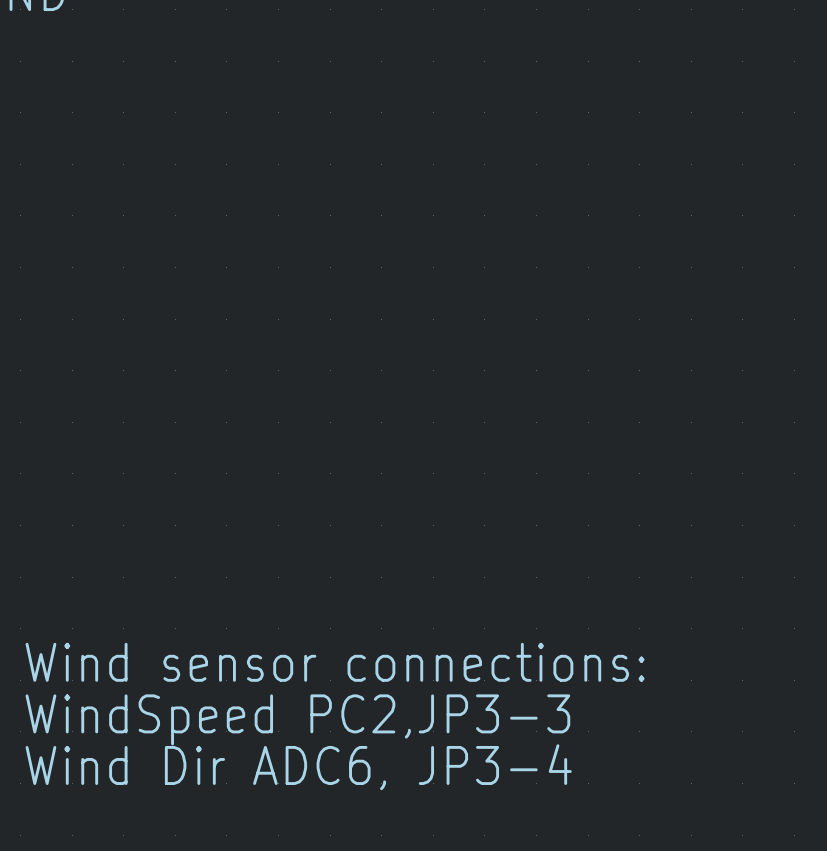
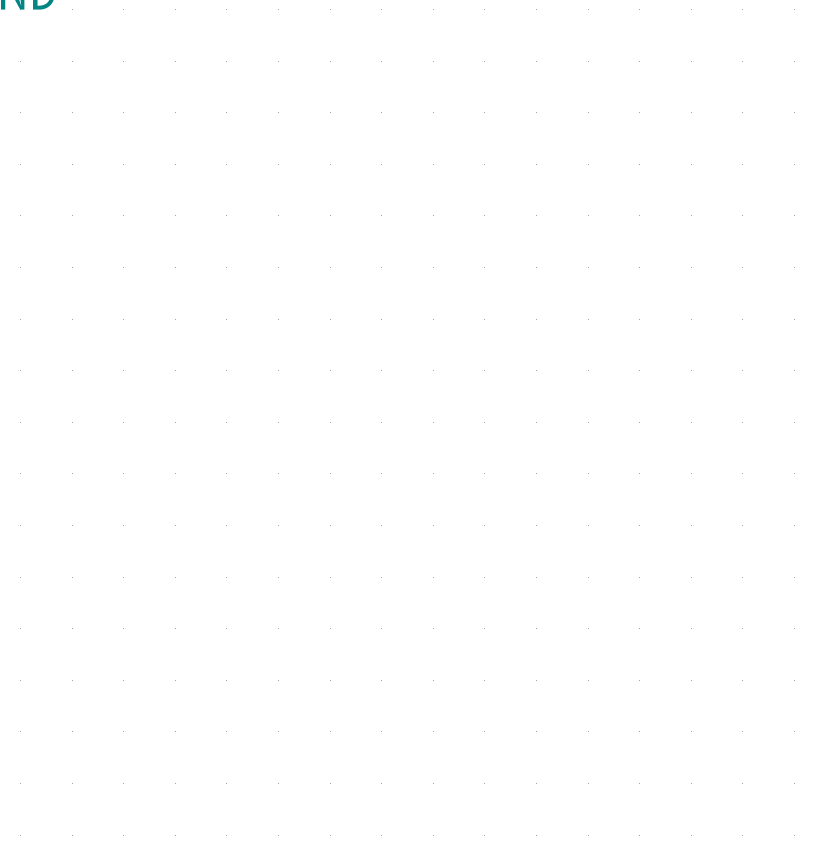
text: Wind sensor connections: (335, 662) -> none
text: WindSpeed PC2,JP3-3 (297, 719) -> none
text: Wind Dir ADC6, JP3-4 (298, 767) -> none

